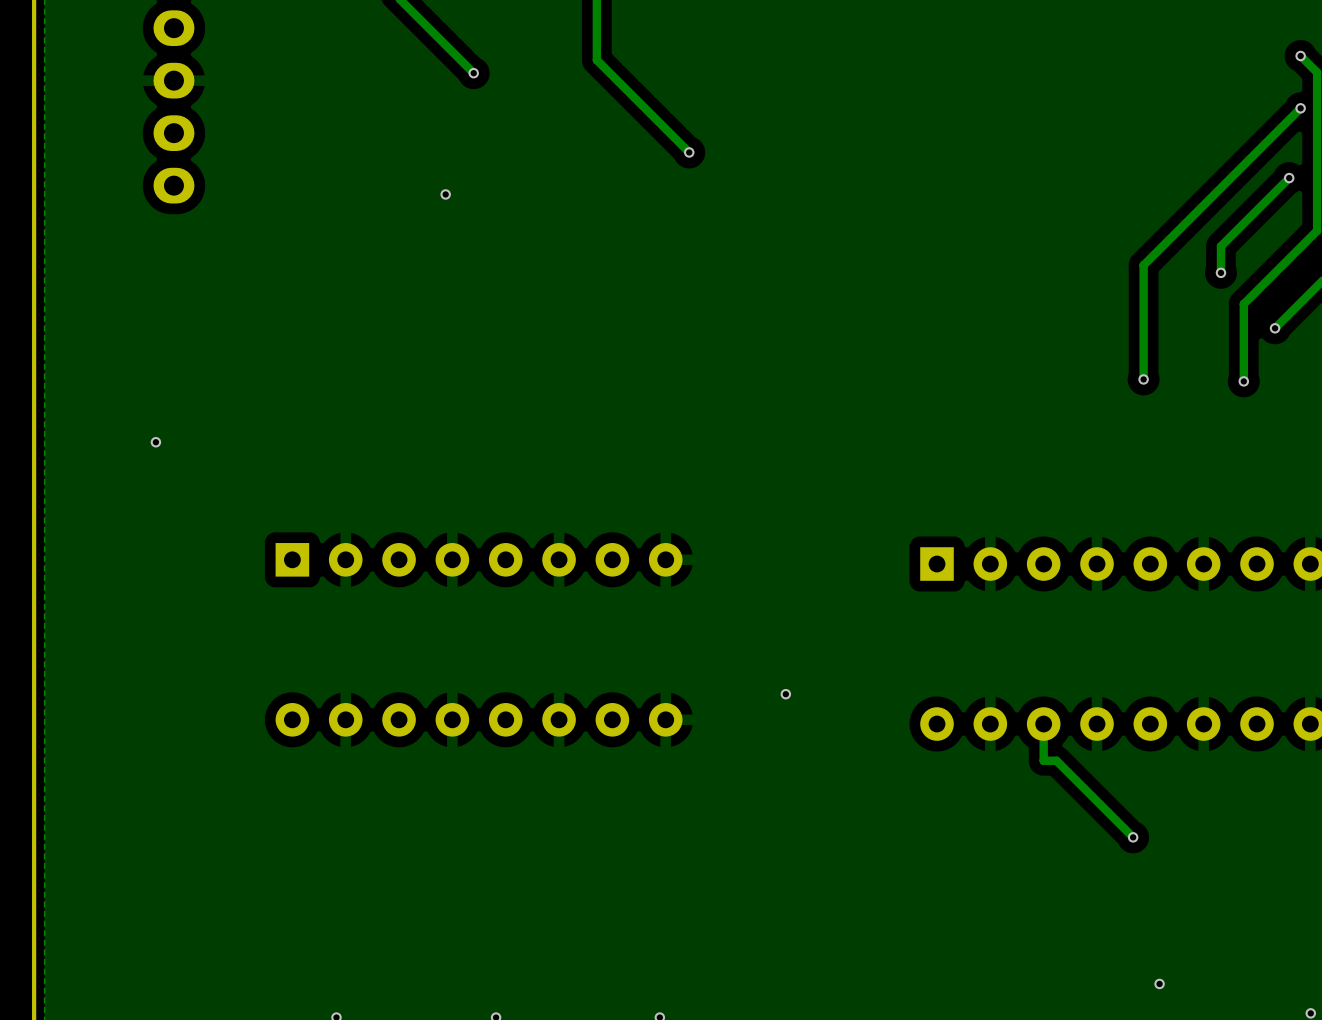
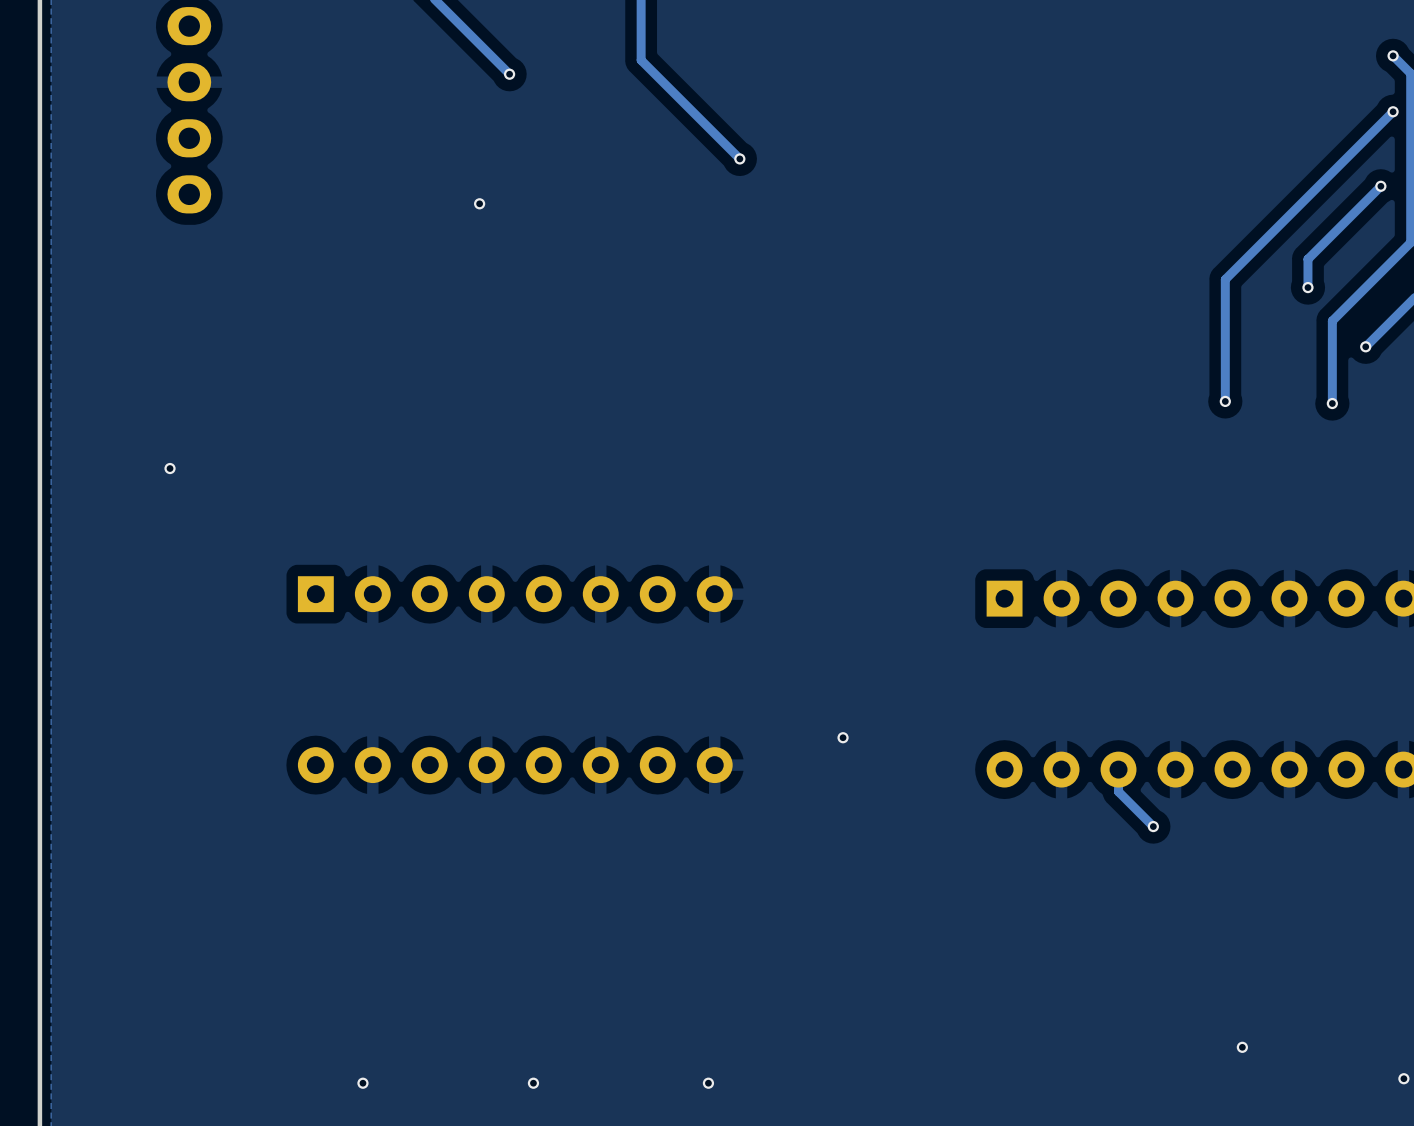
track: (1043, 744) (1043, 760) (1056, 760) (1133, 837) -> (1118, 791) (1153, 826)
via position: (1133, 837) -> (1153, 826)

